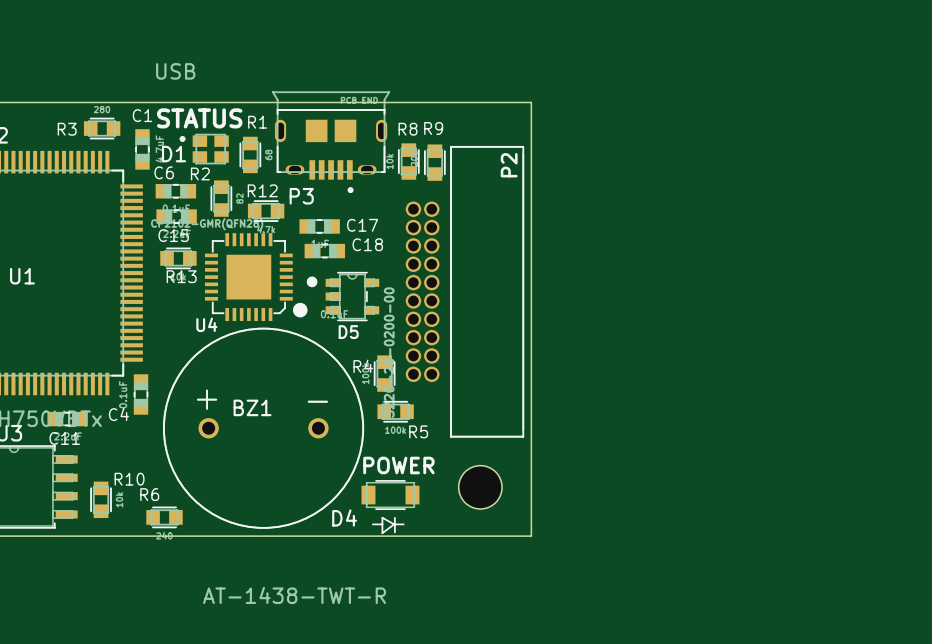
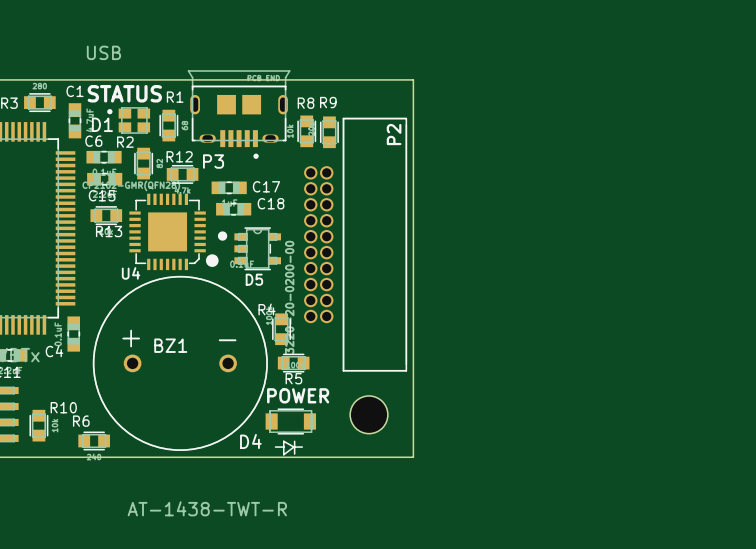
R4 position: (384, 373) -> (281, 329)
R5 position: (395, 411) -> (293, 363)
R5 name position: R5 (418, 431) -> R5 (293, 378)

